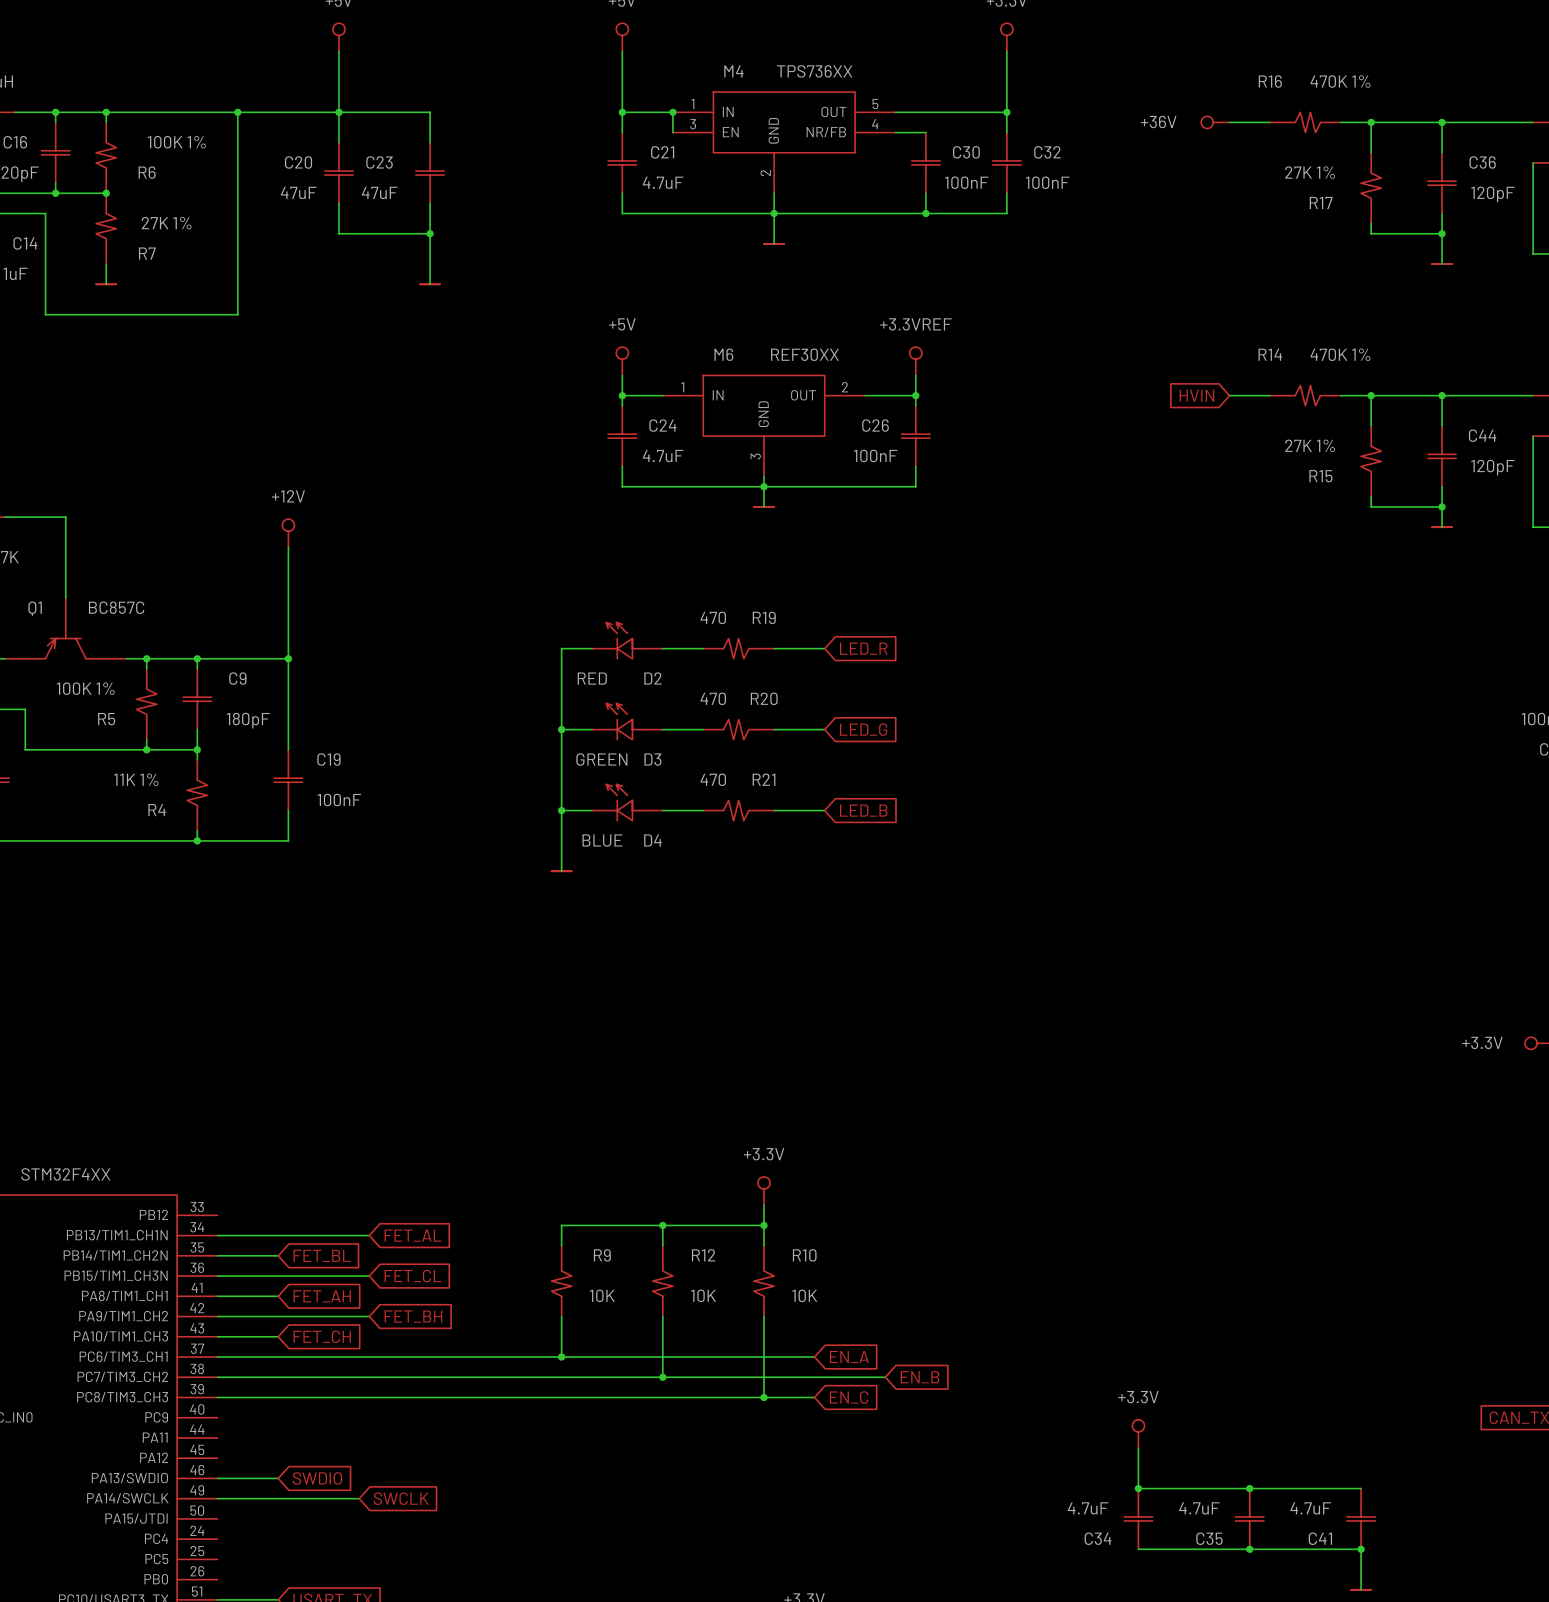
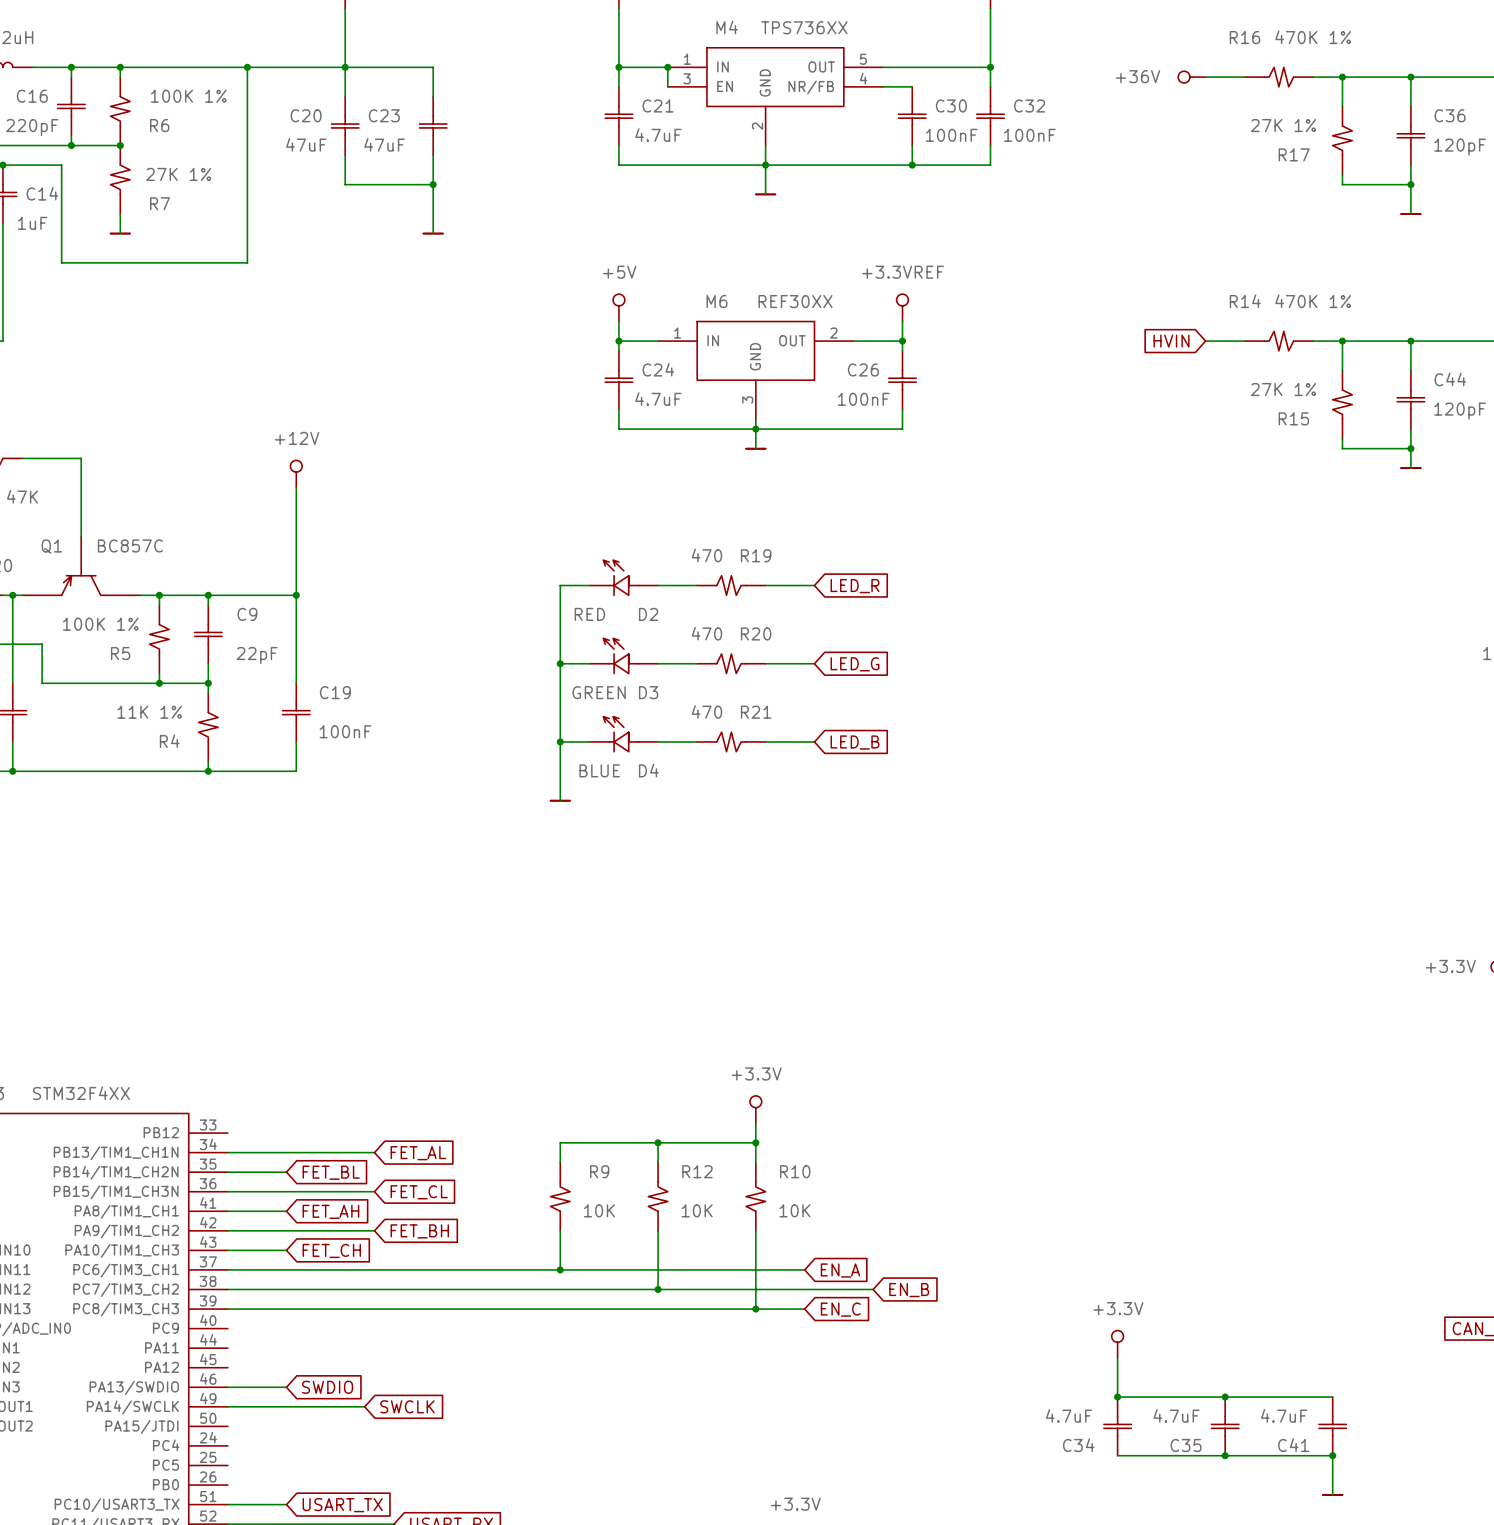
C9 value: 180pF (248, 720) -> 22pF (257, 655)

